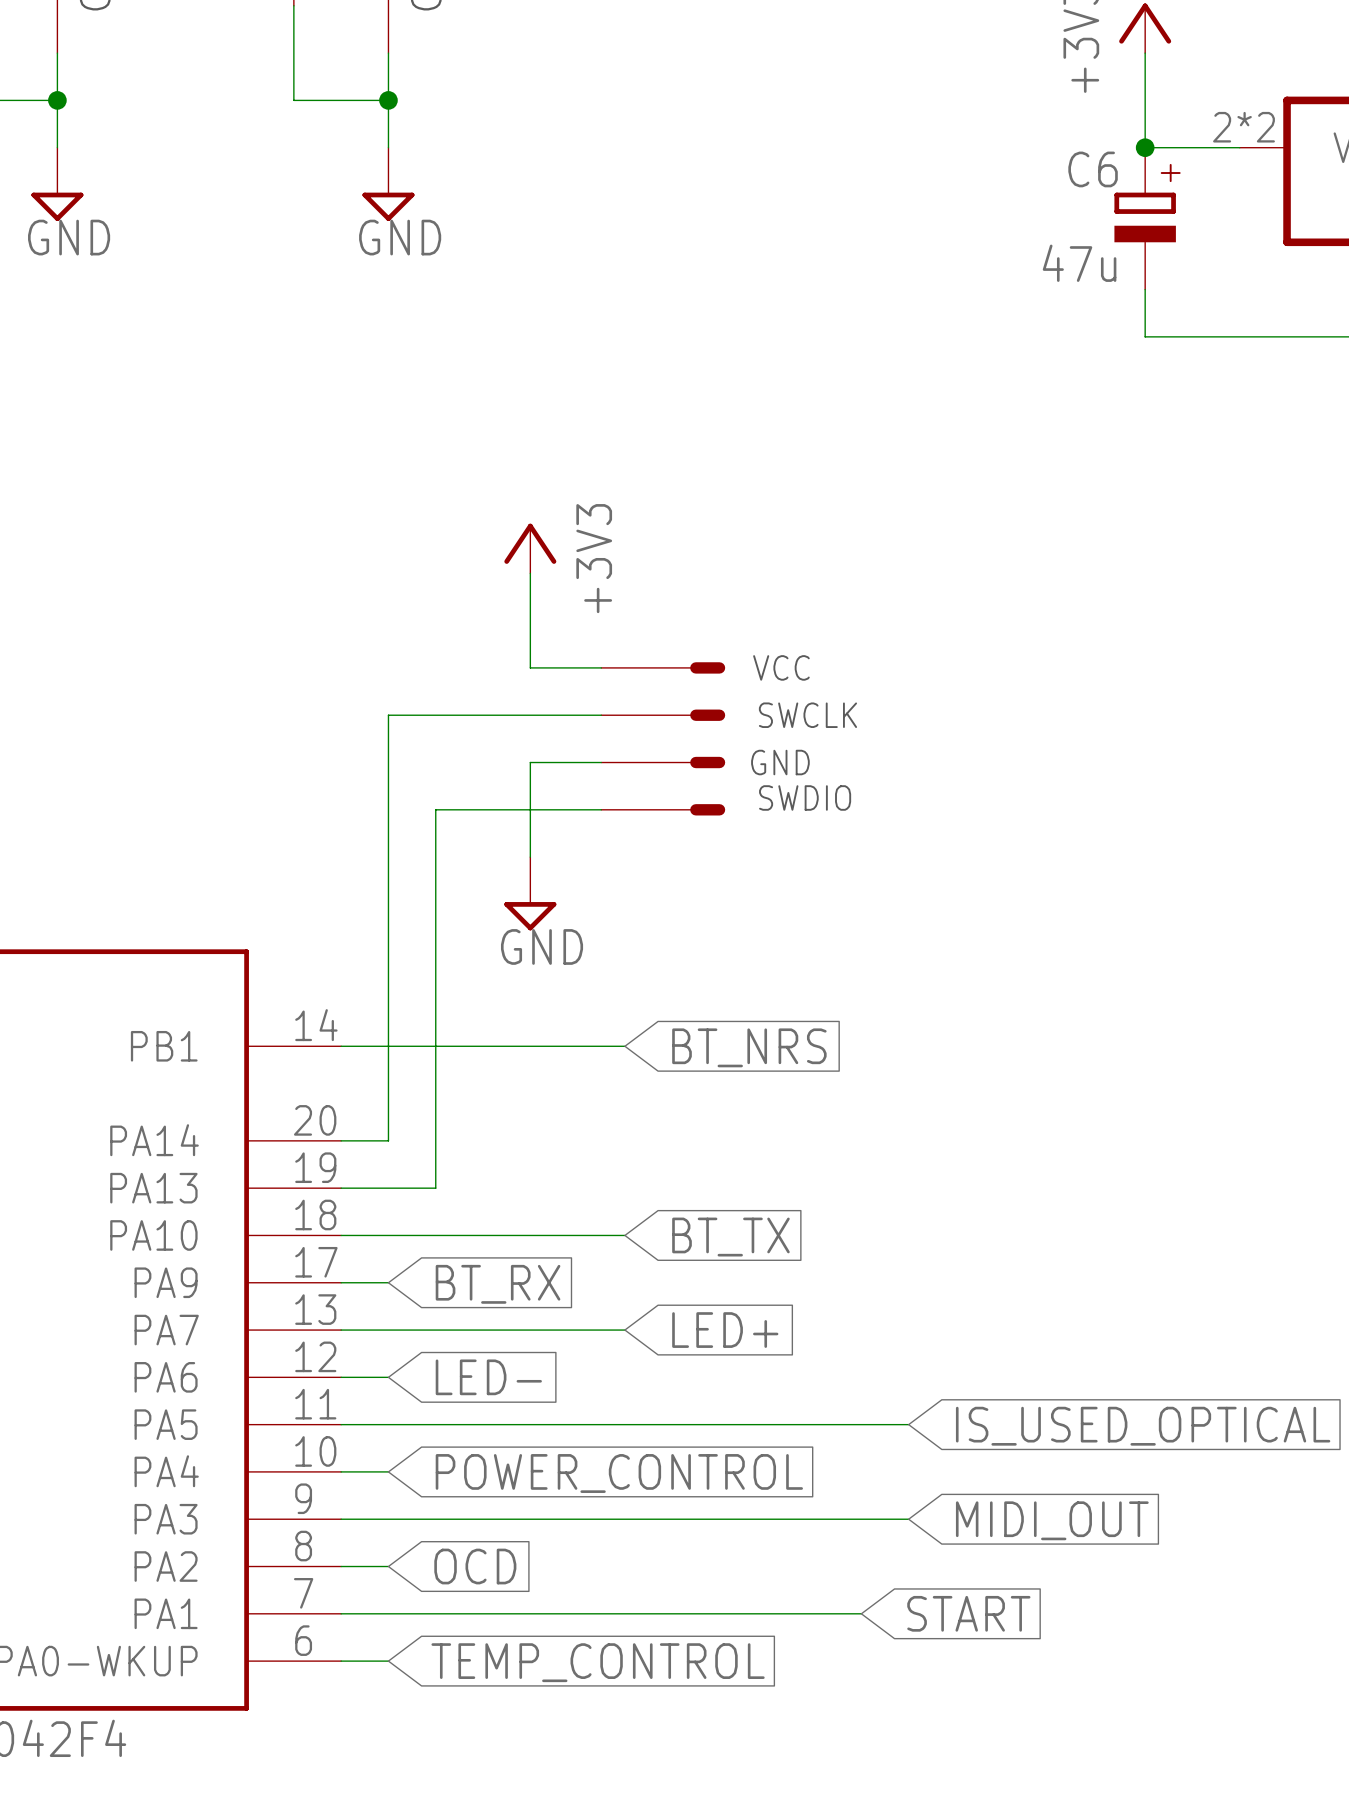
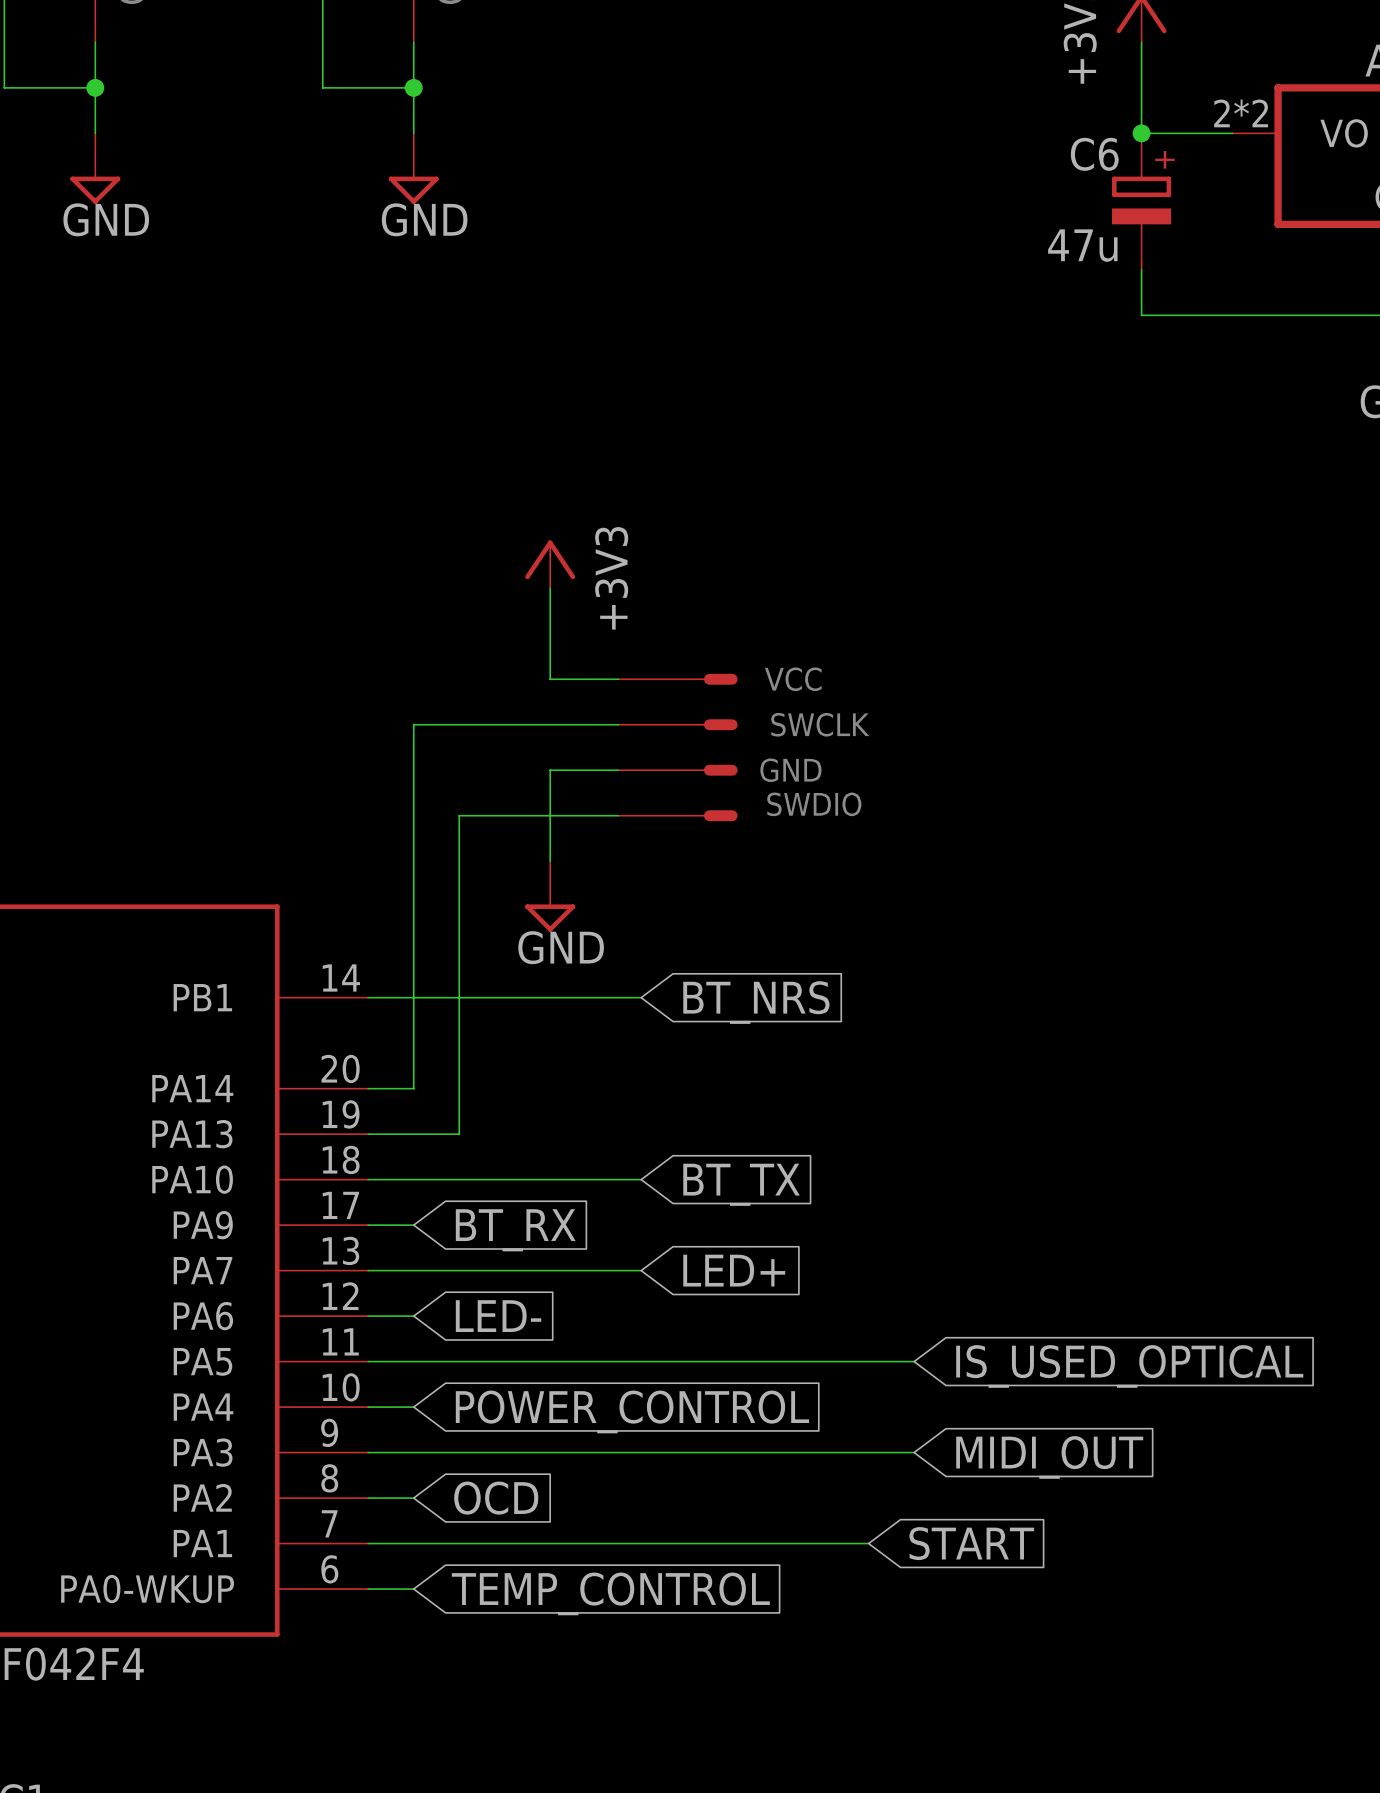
power symbol position: +3V3 (530, 548) -> +3V3 (550, 564)
wire: (530, 667) (601, 667) -> (550, 633) (550, 679)
wire: (530, 715) (388, 715) (388, 762) -> (550, 724) (413, 724)
part position: (663, 738) -> (678, 747)
wire: (530, 762) (530, 809) (435, 809) (435, 857) -> (618, 815) (459, 815)
power symbol position: GND (530, 893) -> GND (550, 896)

